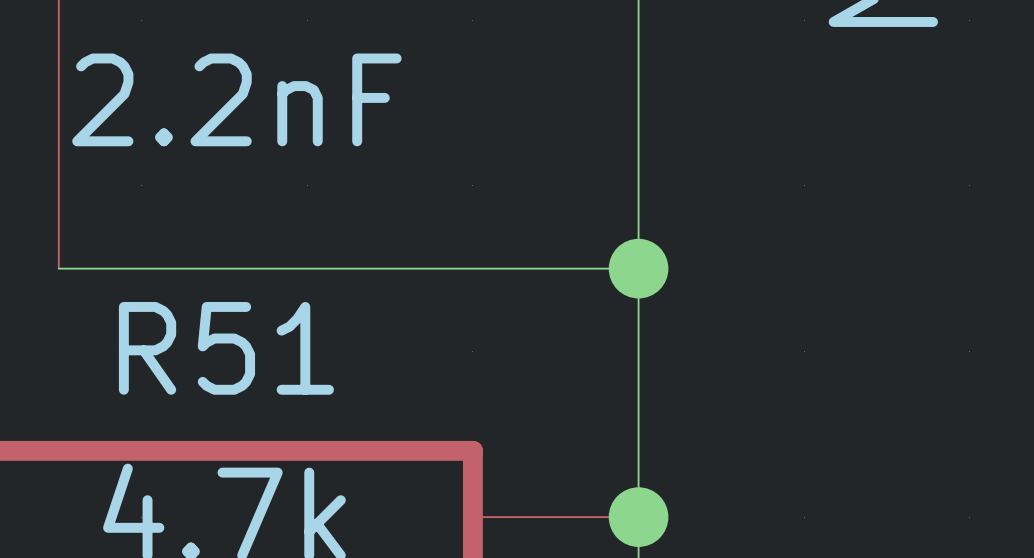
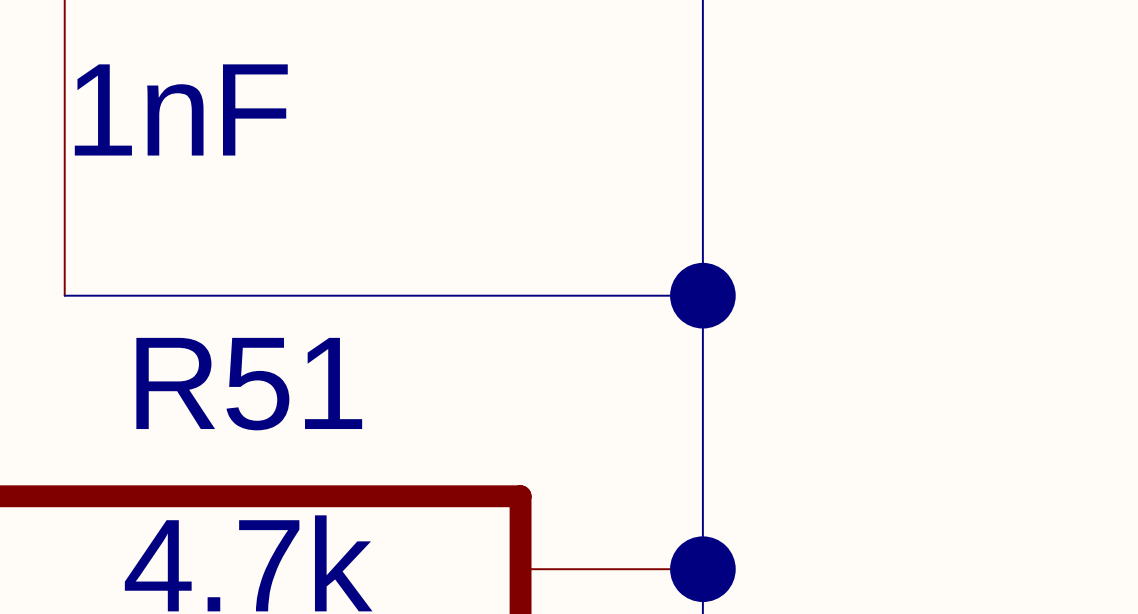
part value: 2.2nF (236, 99) -> 1nF (181, 109)

